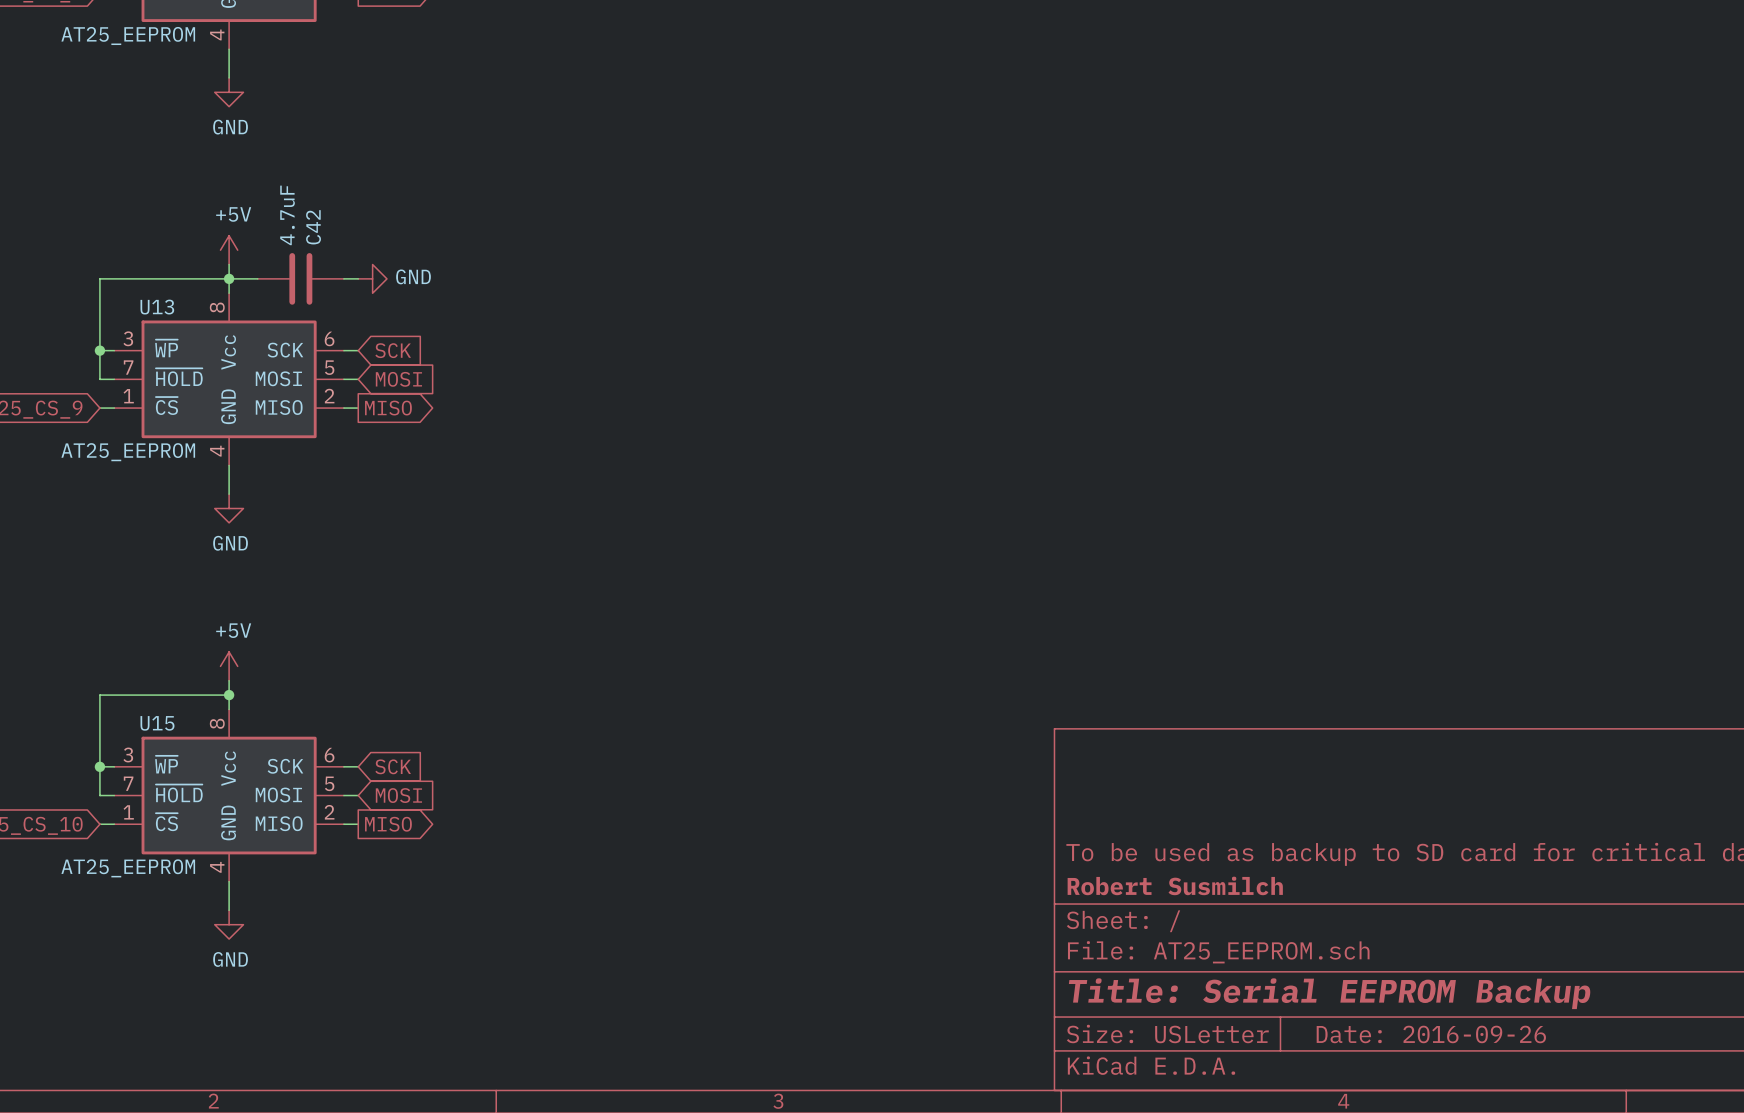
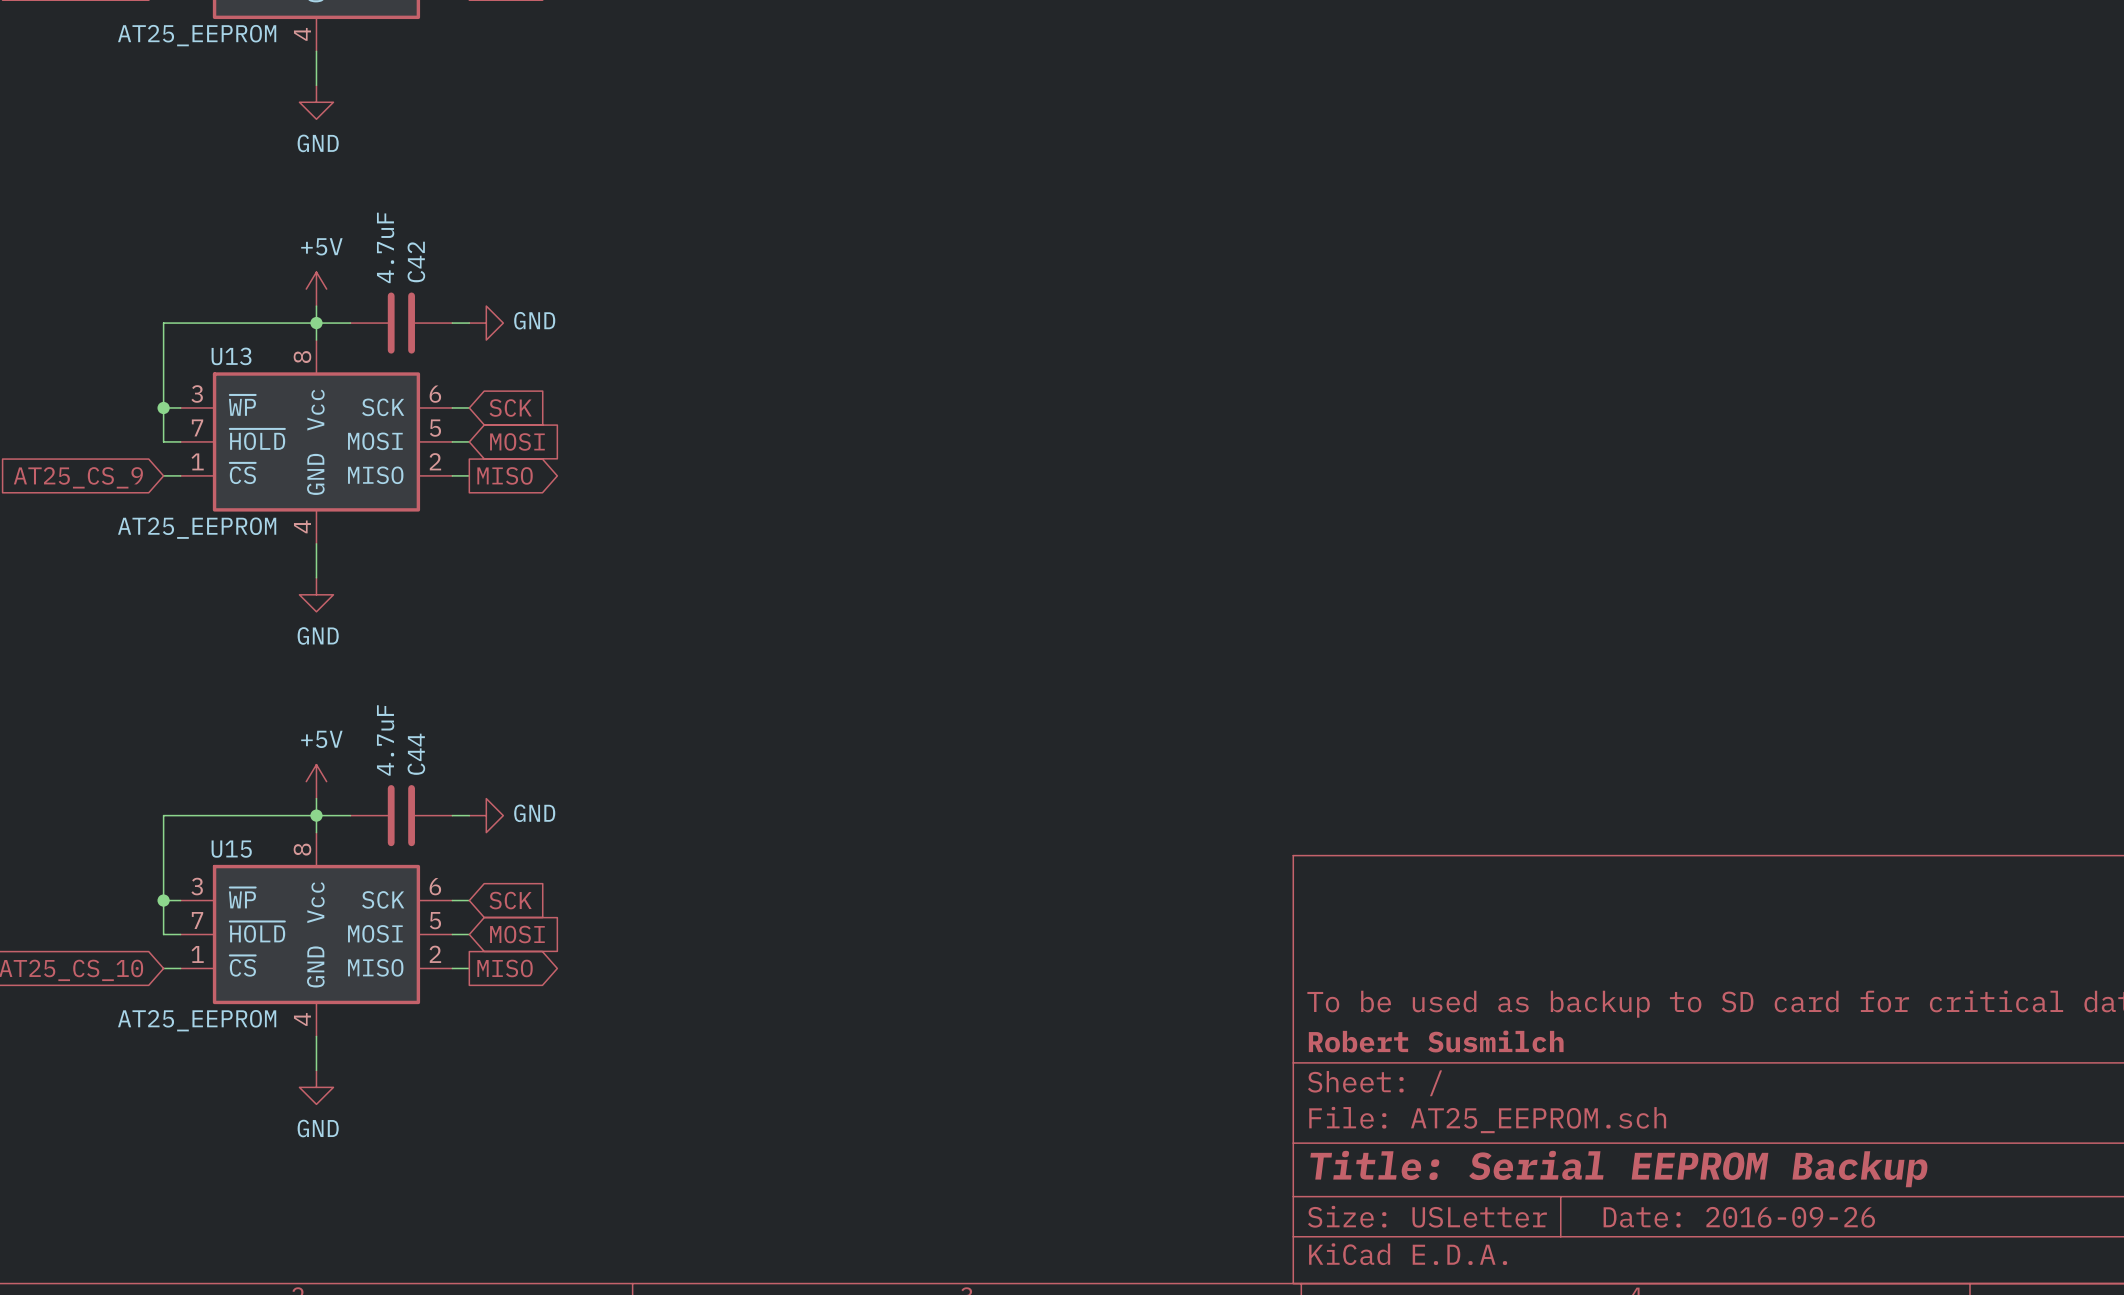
wire: none -> (316, 815) (350, 815)
C44: none -> 4.7uF (401, 815)
wire: none -> (452, 815) (469, 815)
power symbol: none -> GND (486, 815)

